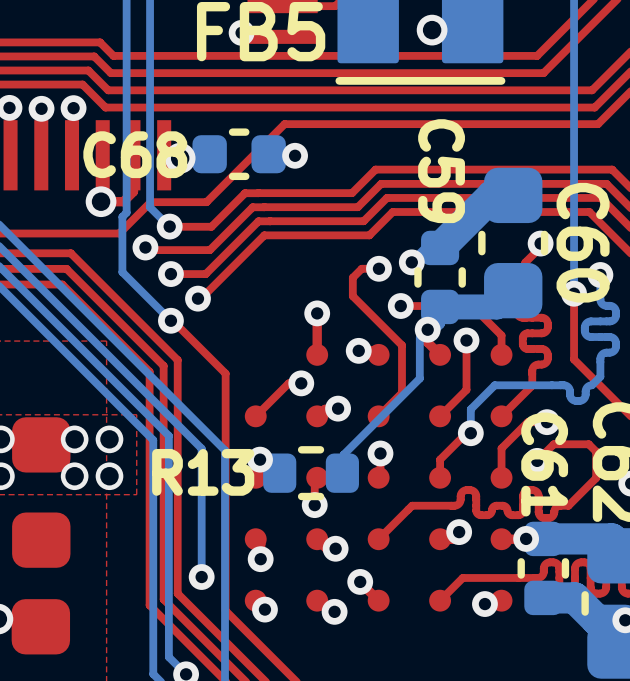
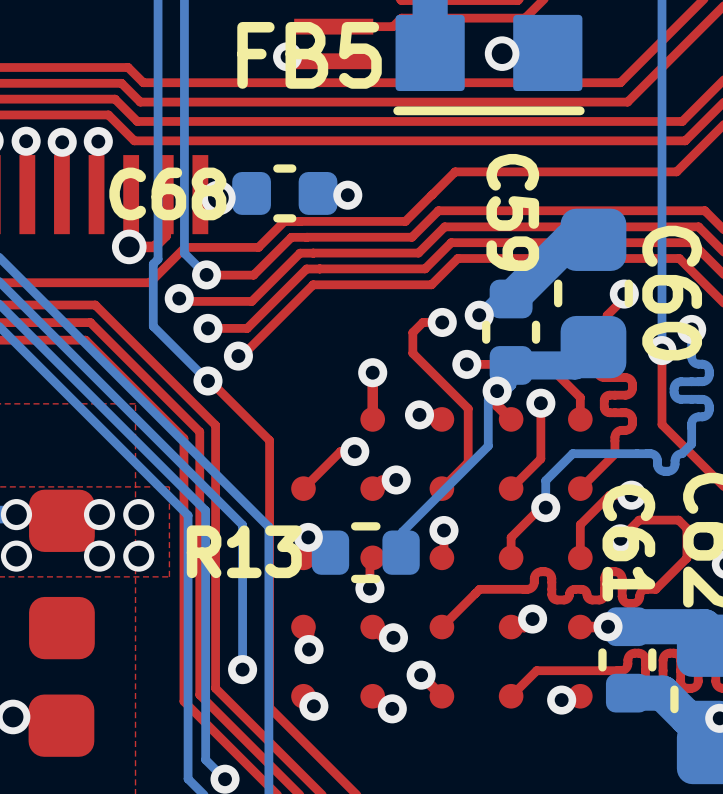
top track: (598, 124) (284, 124) (206, 202) -> (688, 159) (676, 171) (455, 171) (405, 221) (300, 221)
top track: none -> (300, 221) (284, 221) (258, 247) (248, 247)

